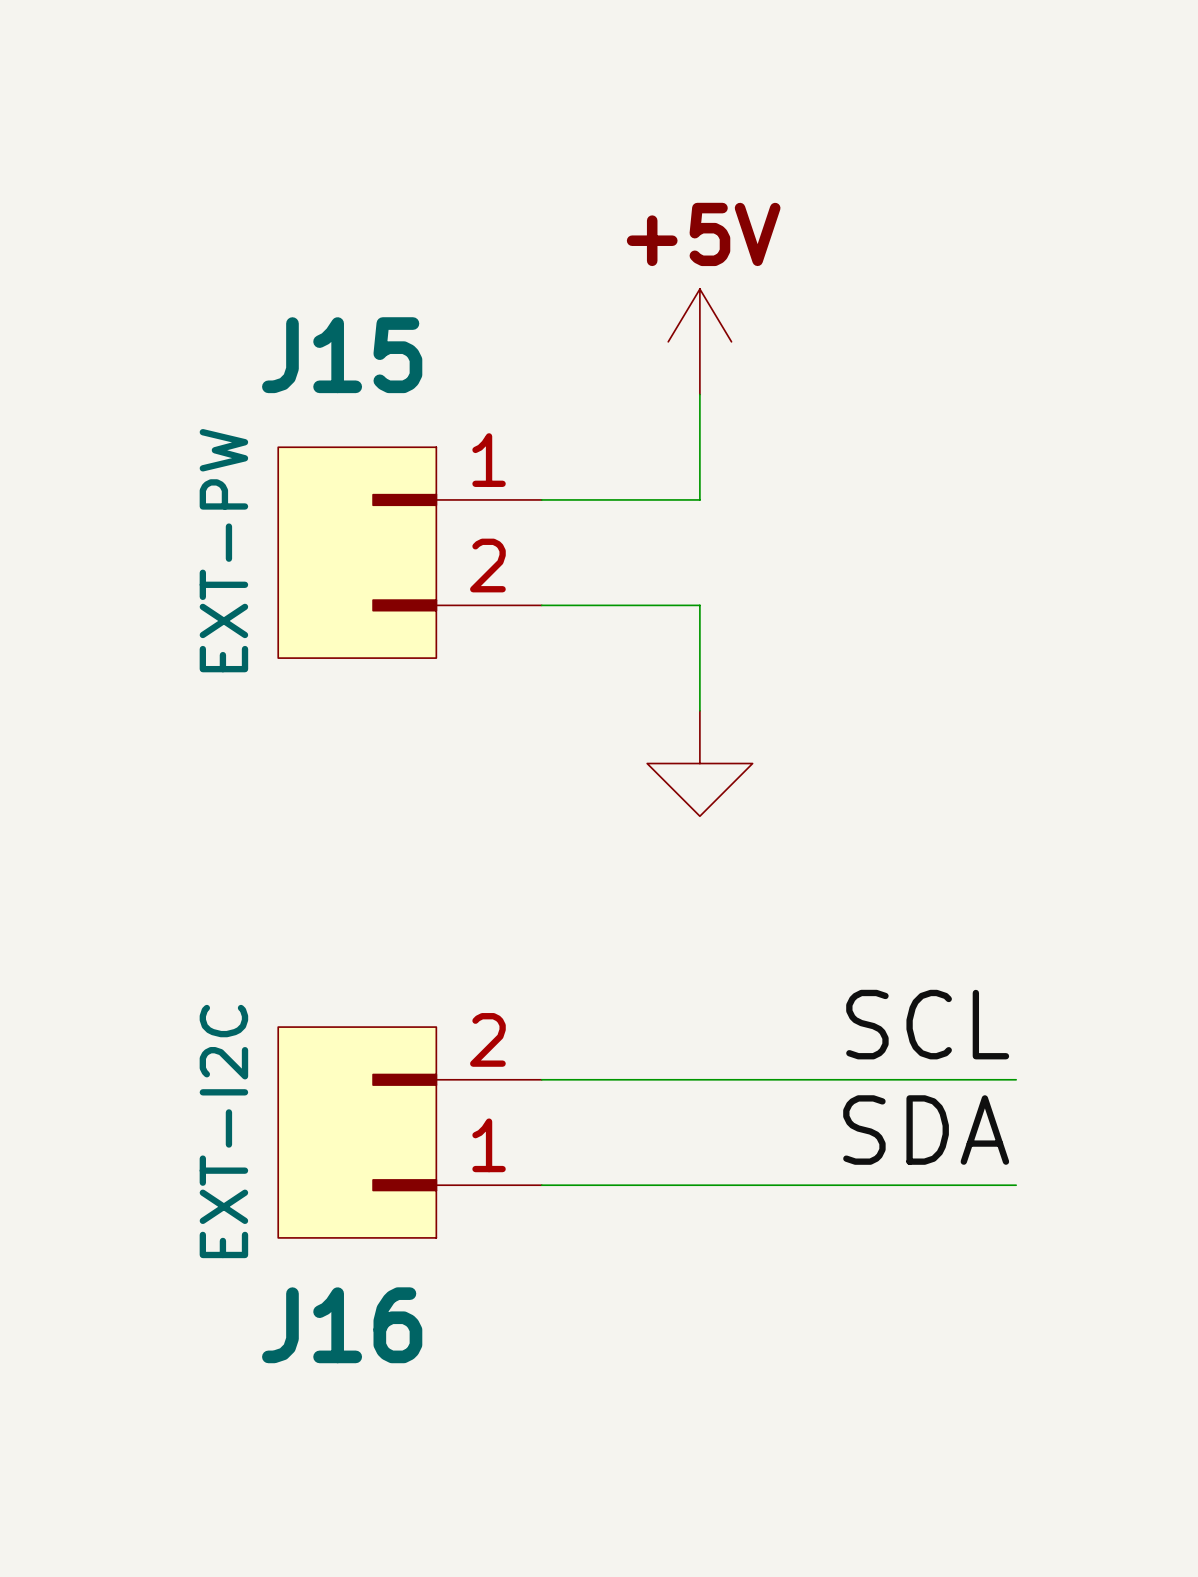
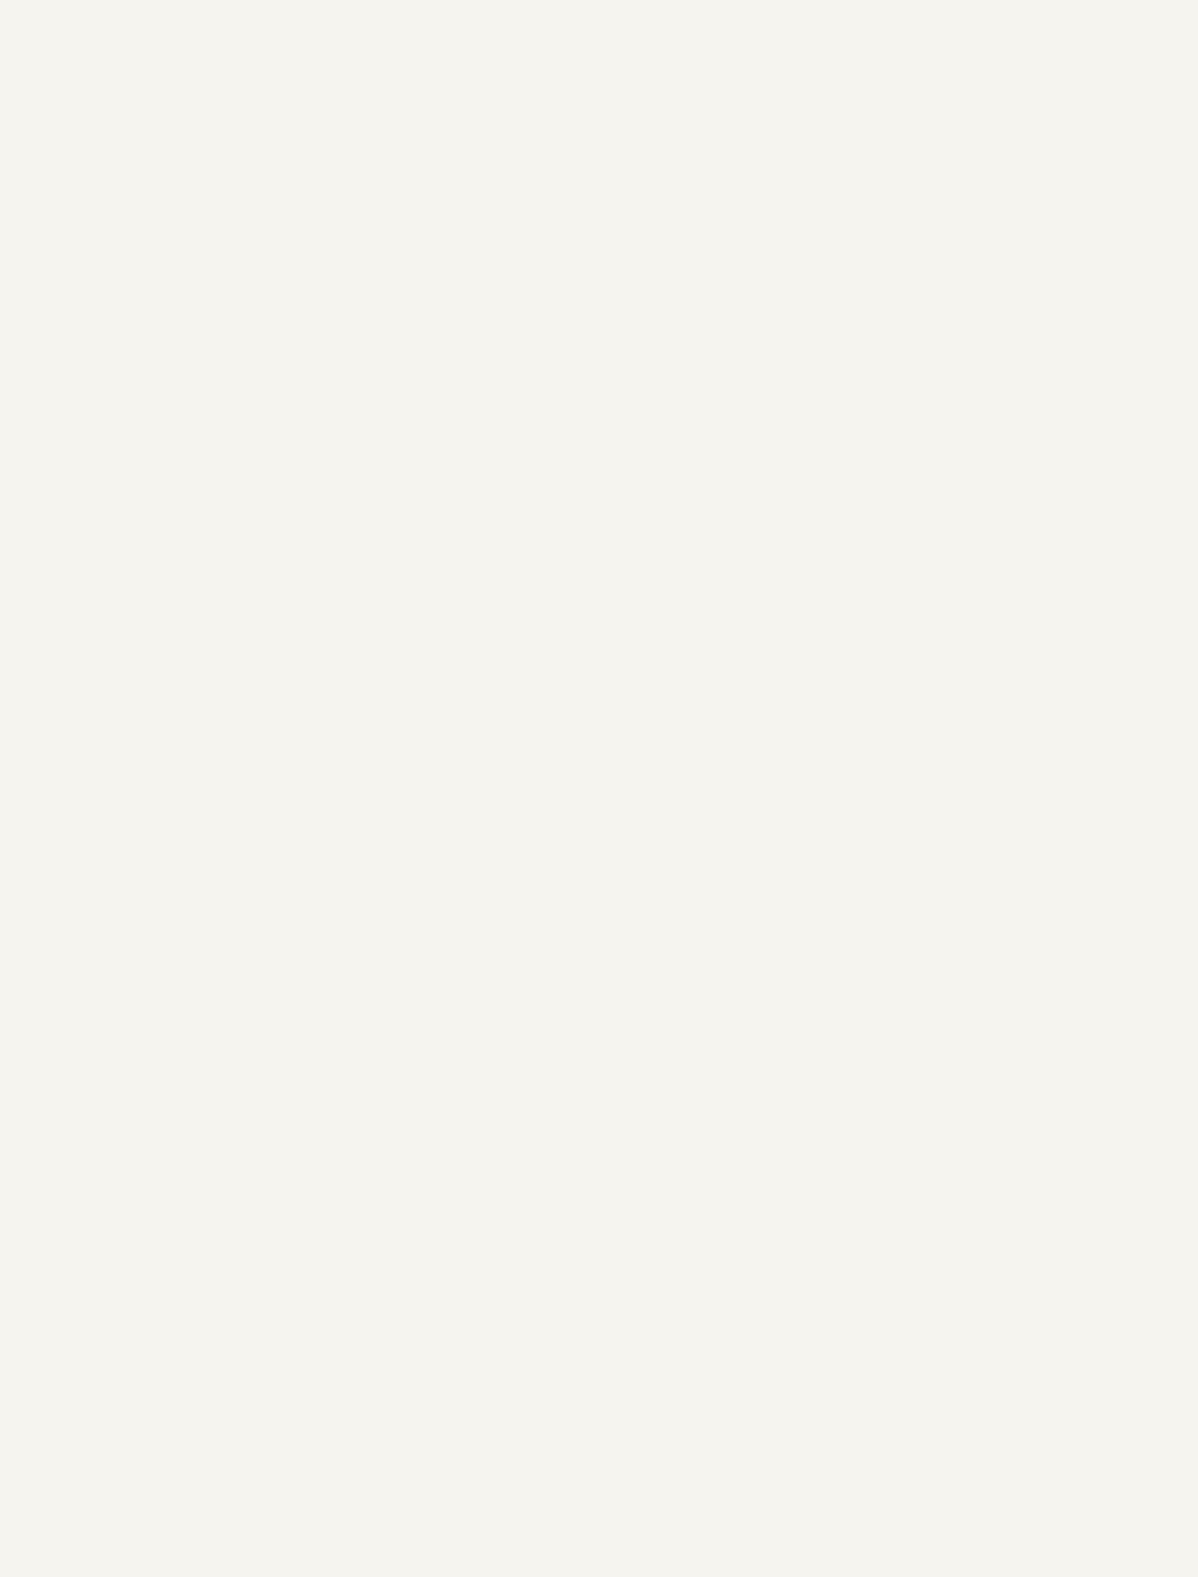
power symbol: (699, 341) -> none
wire: (699, 394) (699, 499) (541, 499) -> none
J15: EXT-PW (409, 552) -> none
wire: (541, 605) (699, 605) (699, 710) -> none
power symbol: (699, 763) -> none
label: SCL (927, 1024) -> none
wire: (541, 1079) (1016, 1079) -> none
label: SDA (926, 1130) -> none
J16: EXT-I2C (409, 1132) -> none
wire: (541, 1185) (1016, 1185) -> none

